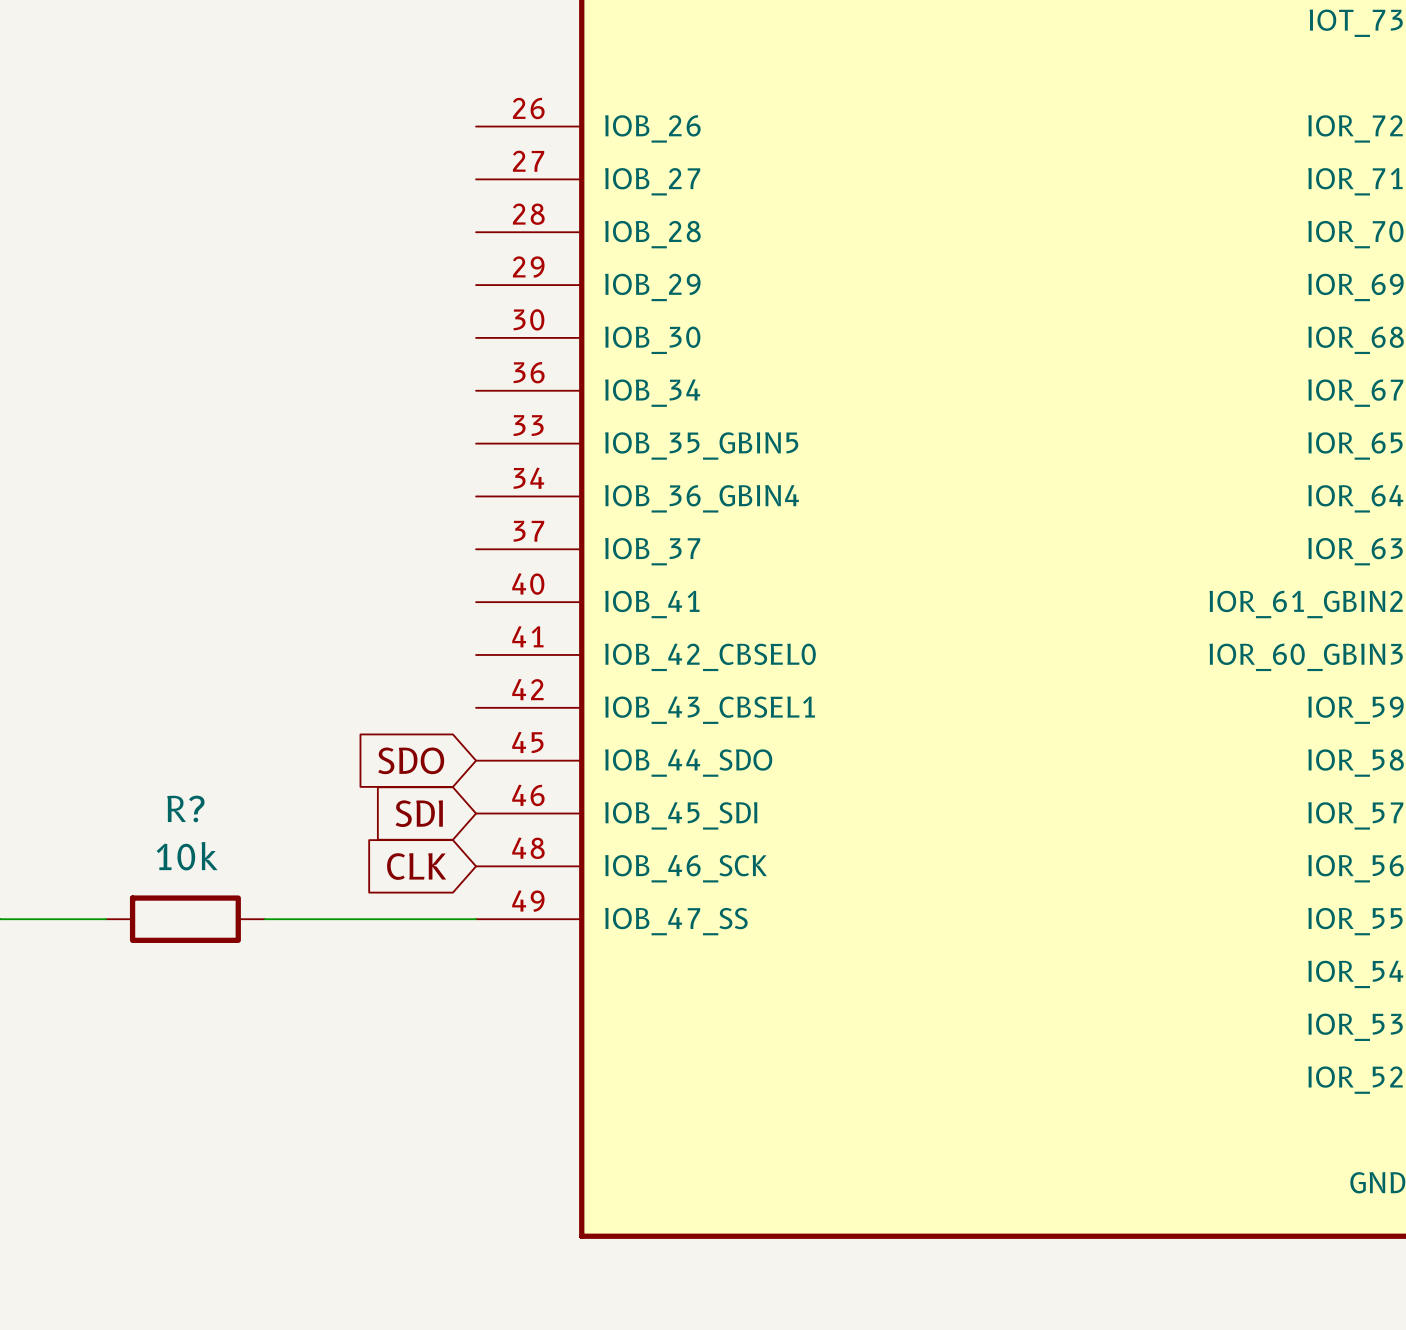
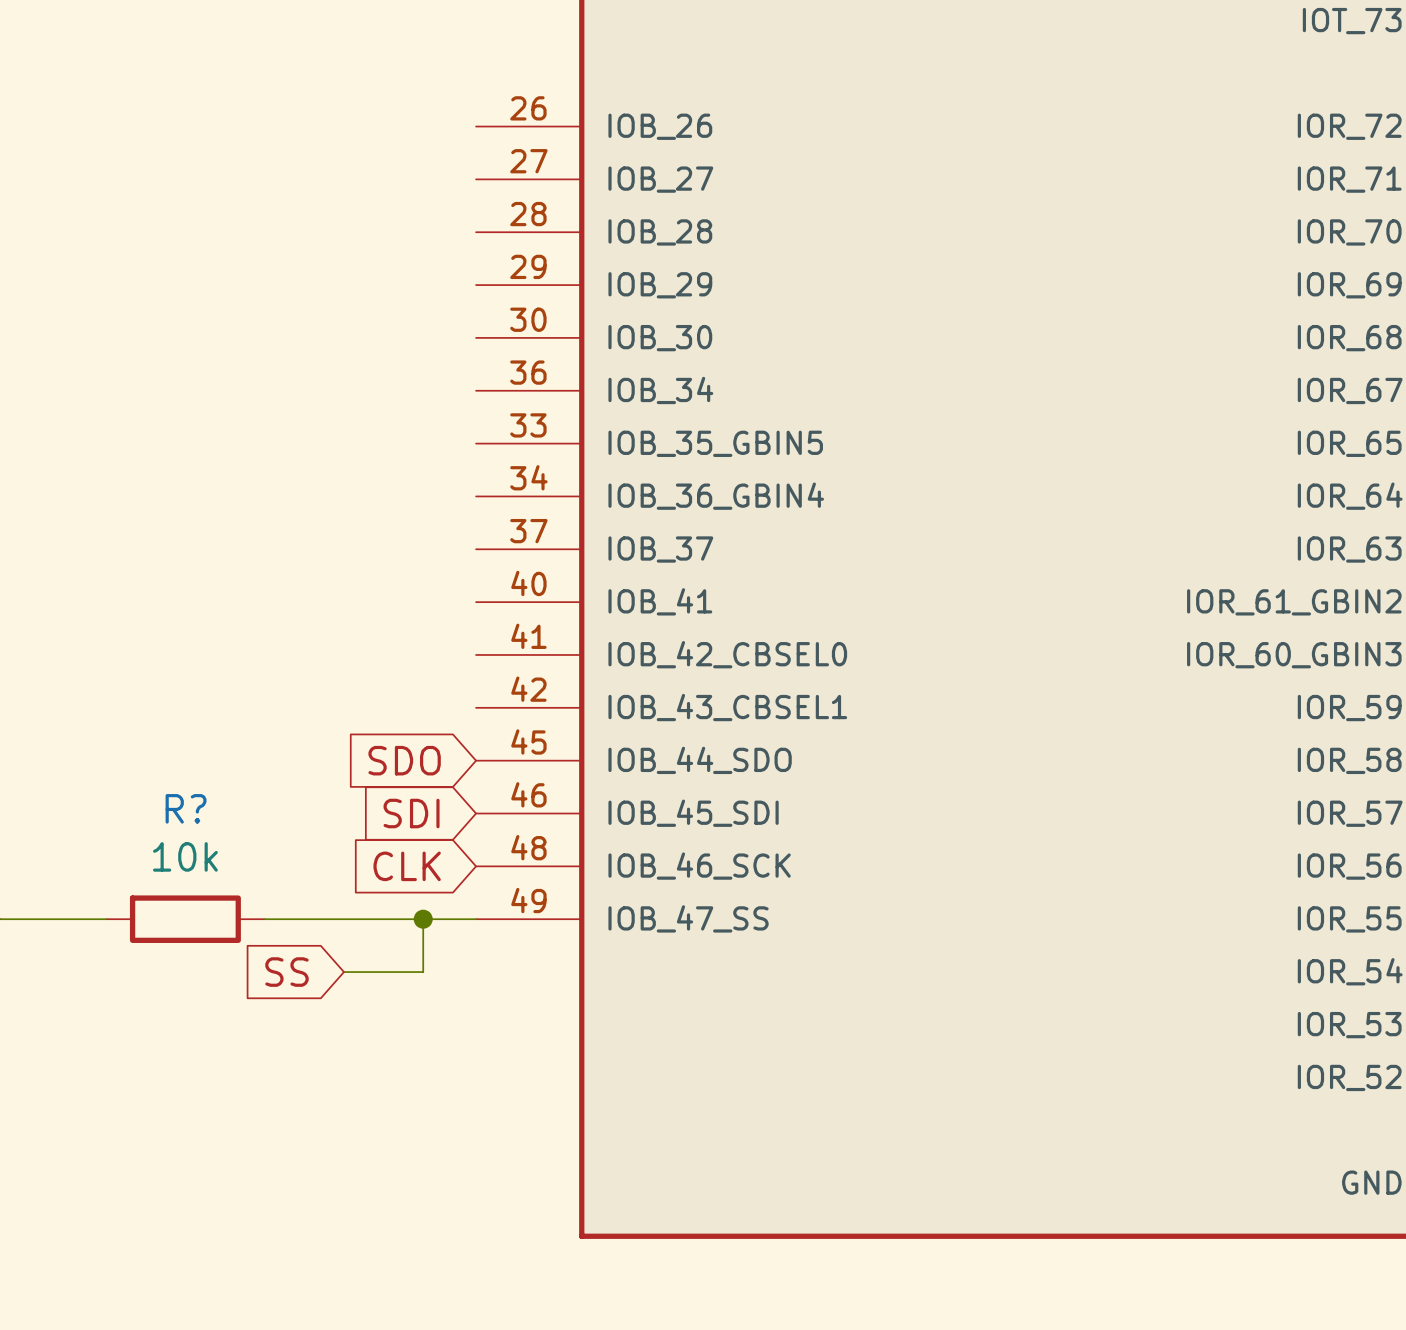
wire: none -> (423, 919) (423, 972) (343, 972)
junction: none -> (423, 919)
global label: none -> SS (286, 972)

